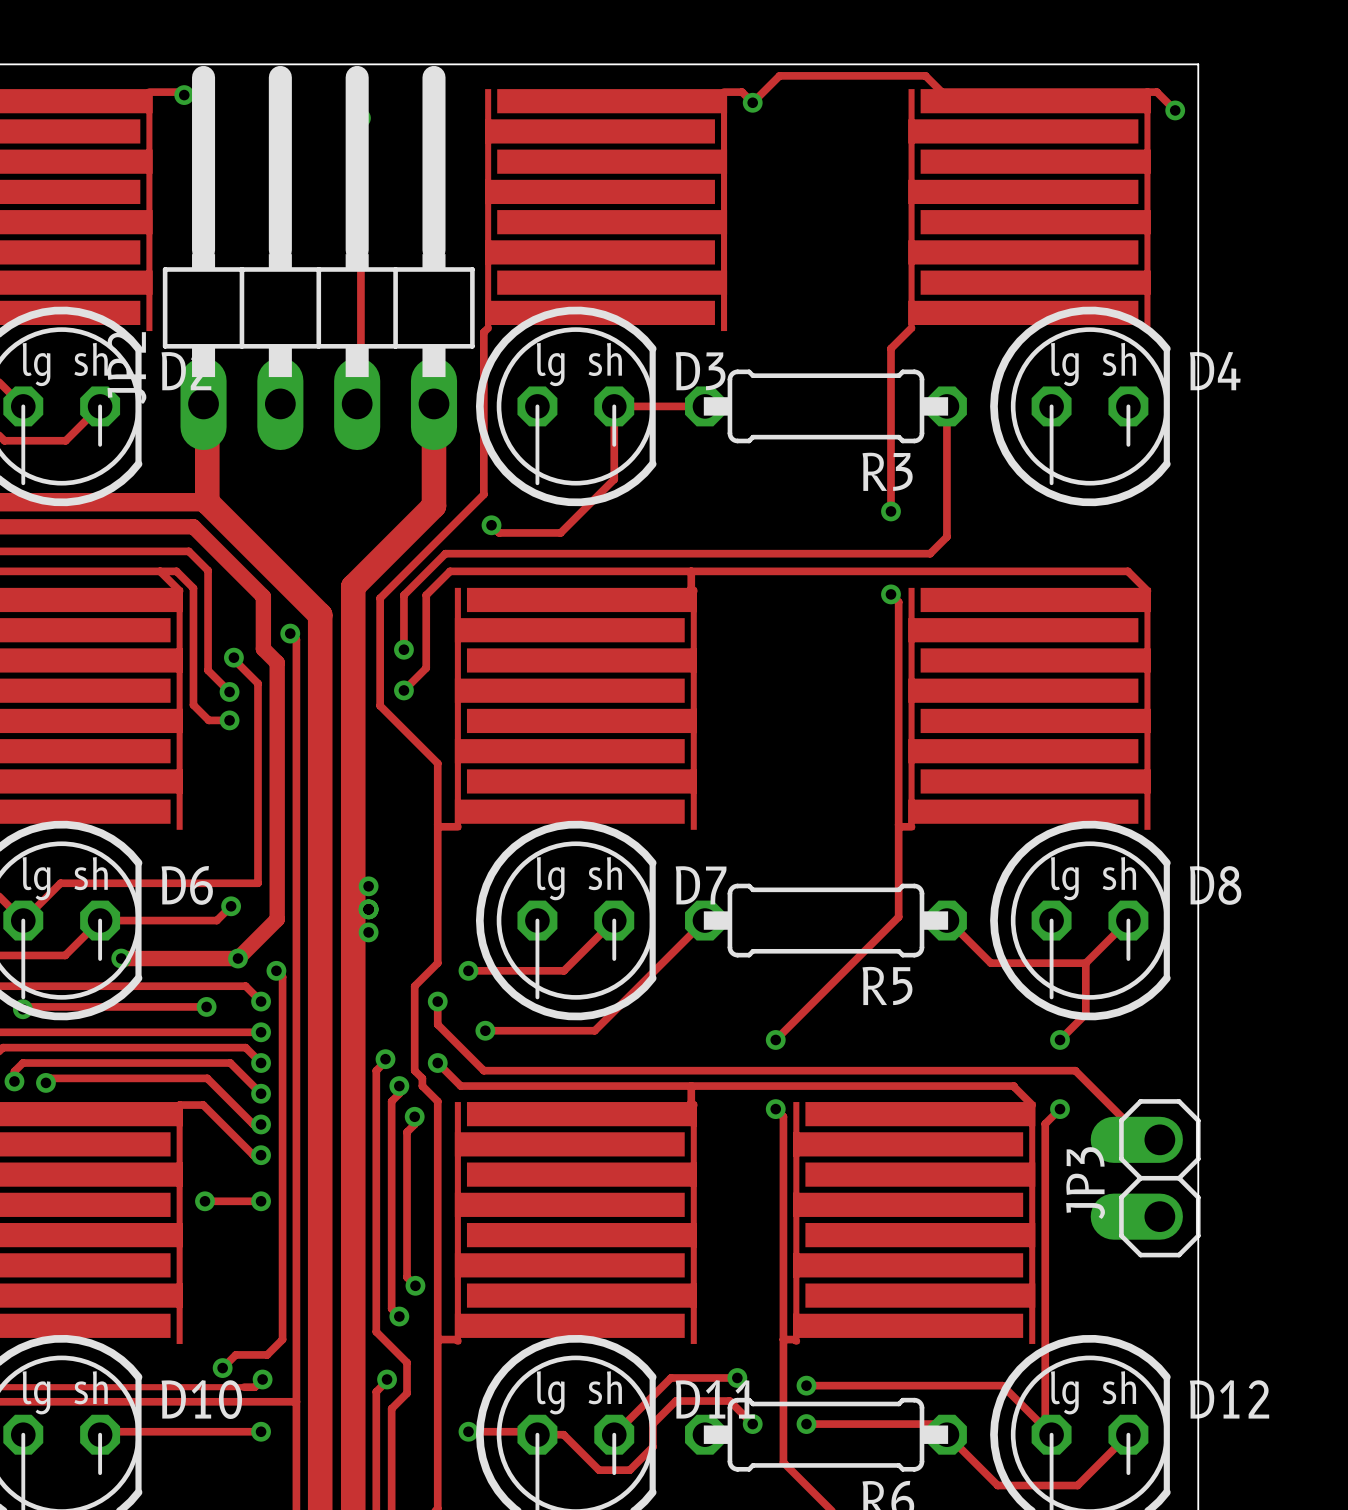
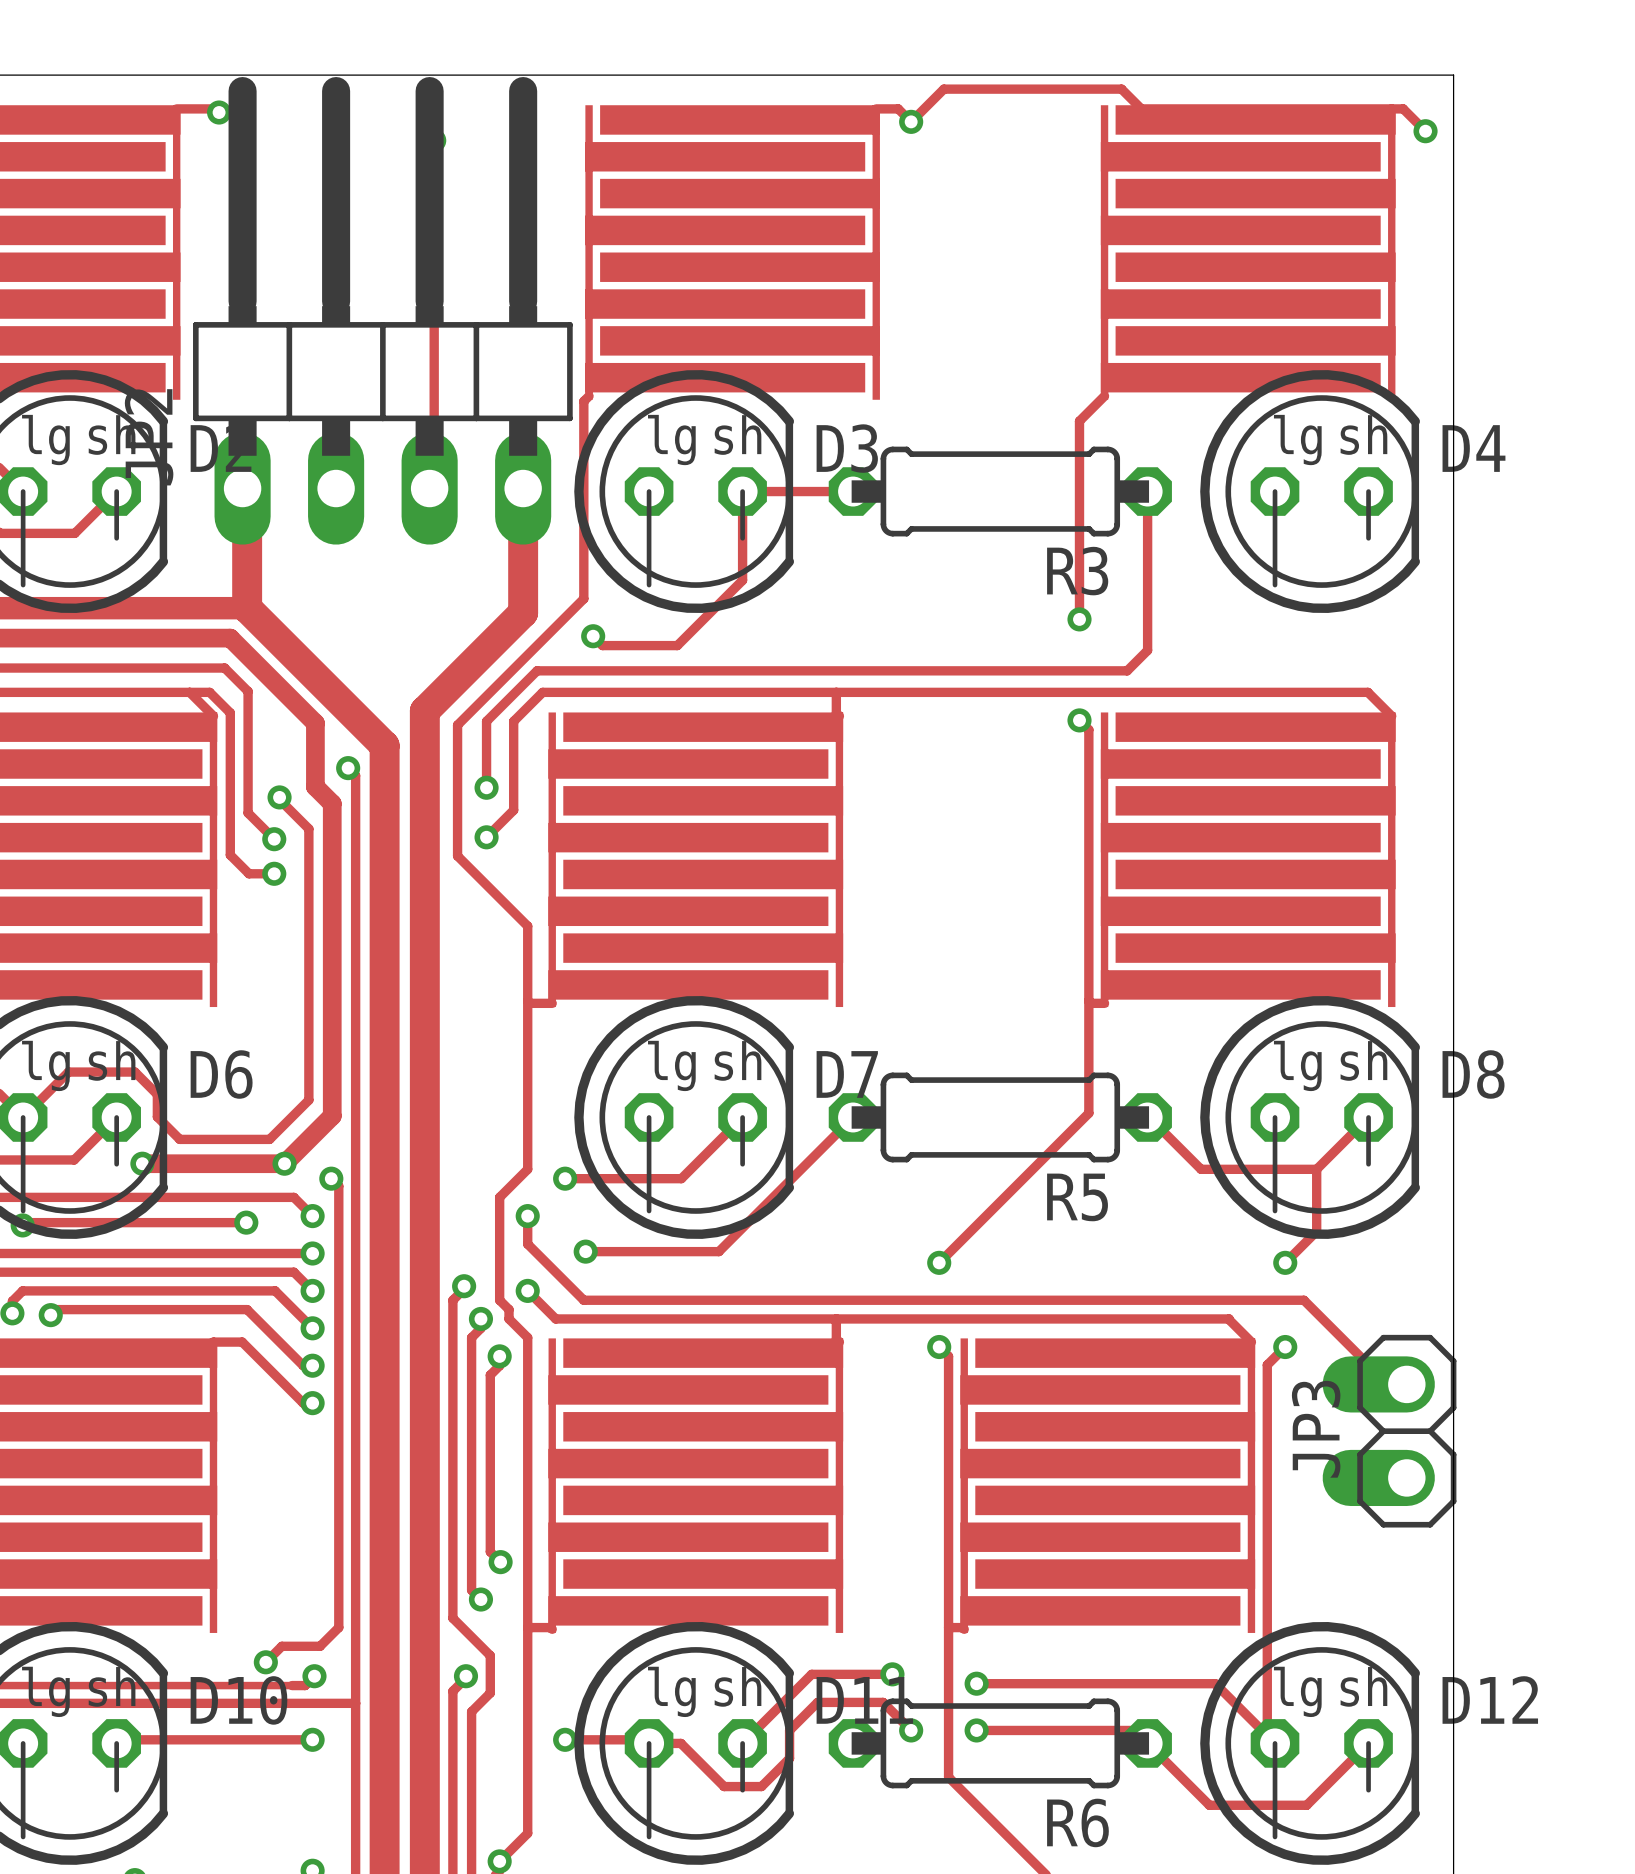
track: (115, 883) (257, 883) -> (134, 1072) (157, 1094) (157, 1116) (179, 1139) (269, 1139) (308, 1100) (308, 1072)
via: (368, 886) -> none
track: (231, 906) (216, 920) (100, 920) -> none
via: (231, 906) -> none
via: (368, 909) -> none
via: (368, 932) -> none
track: (204, 1201) (261, 1201) -> none
via: (204, 1201) -> none
via: (261, 1201) -> none

